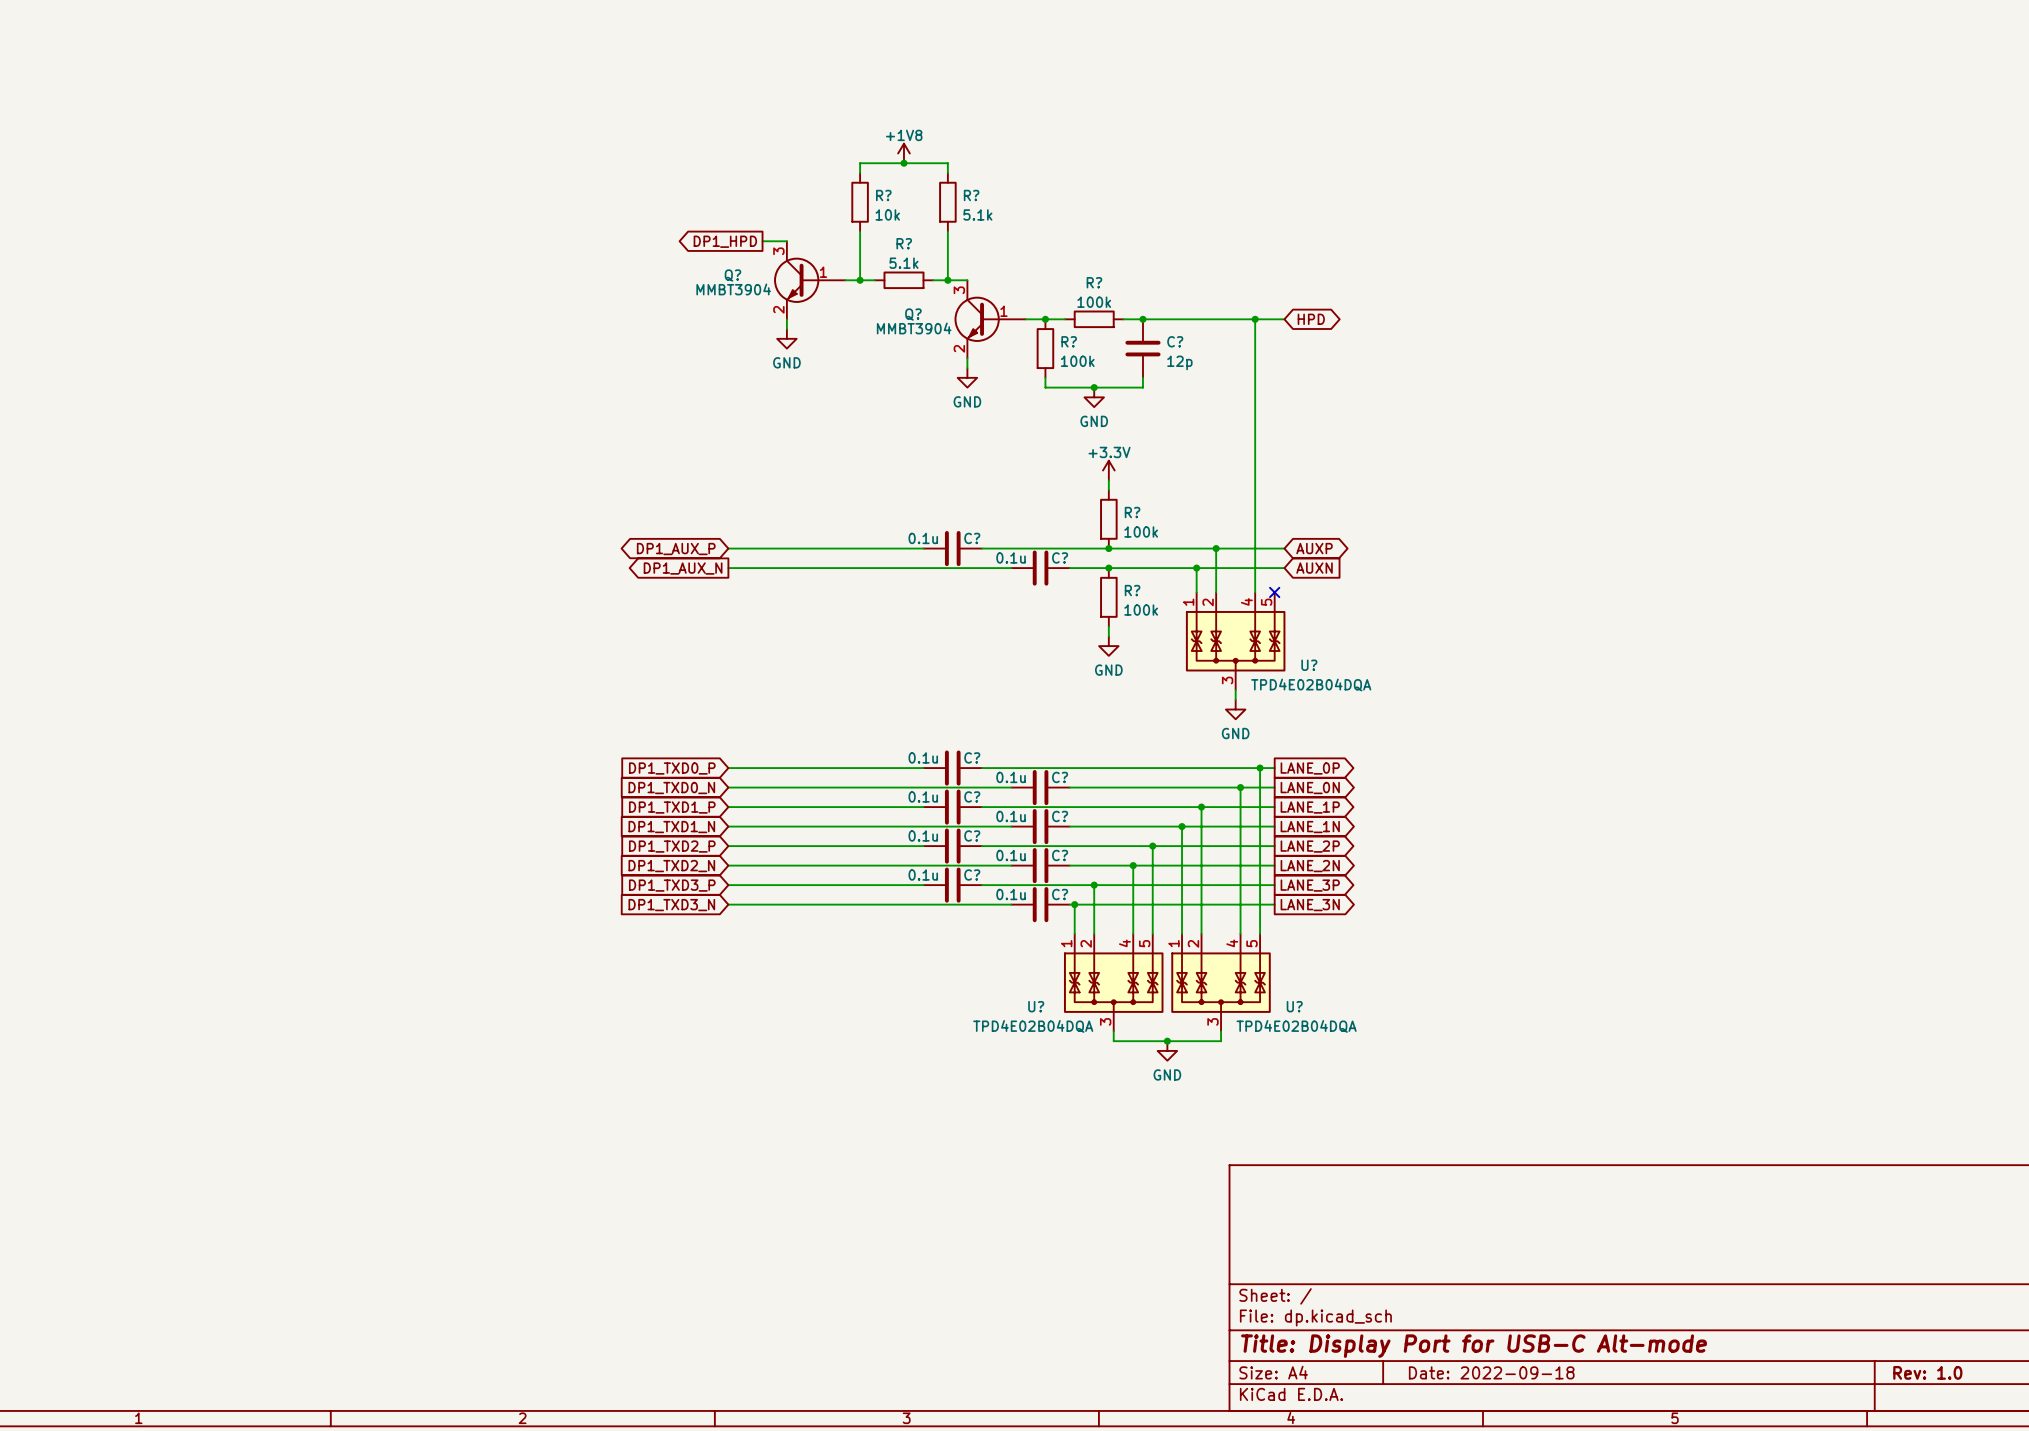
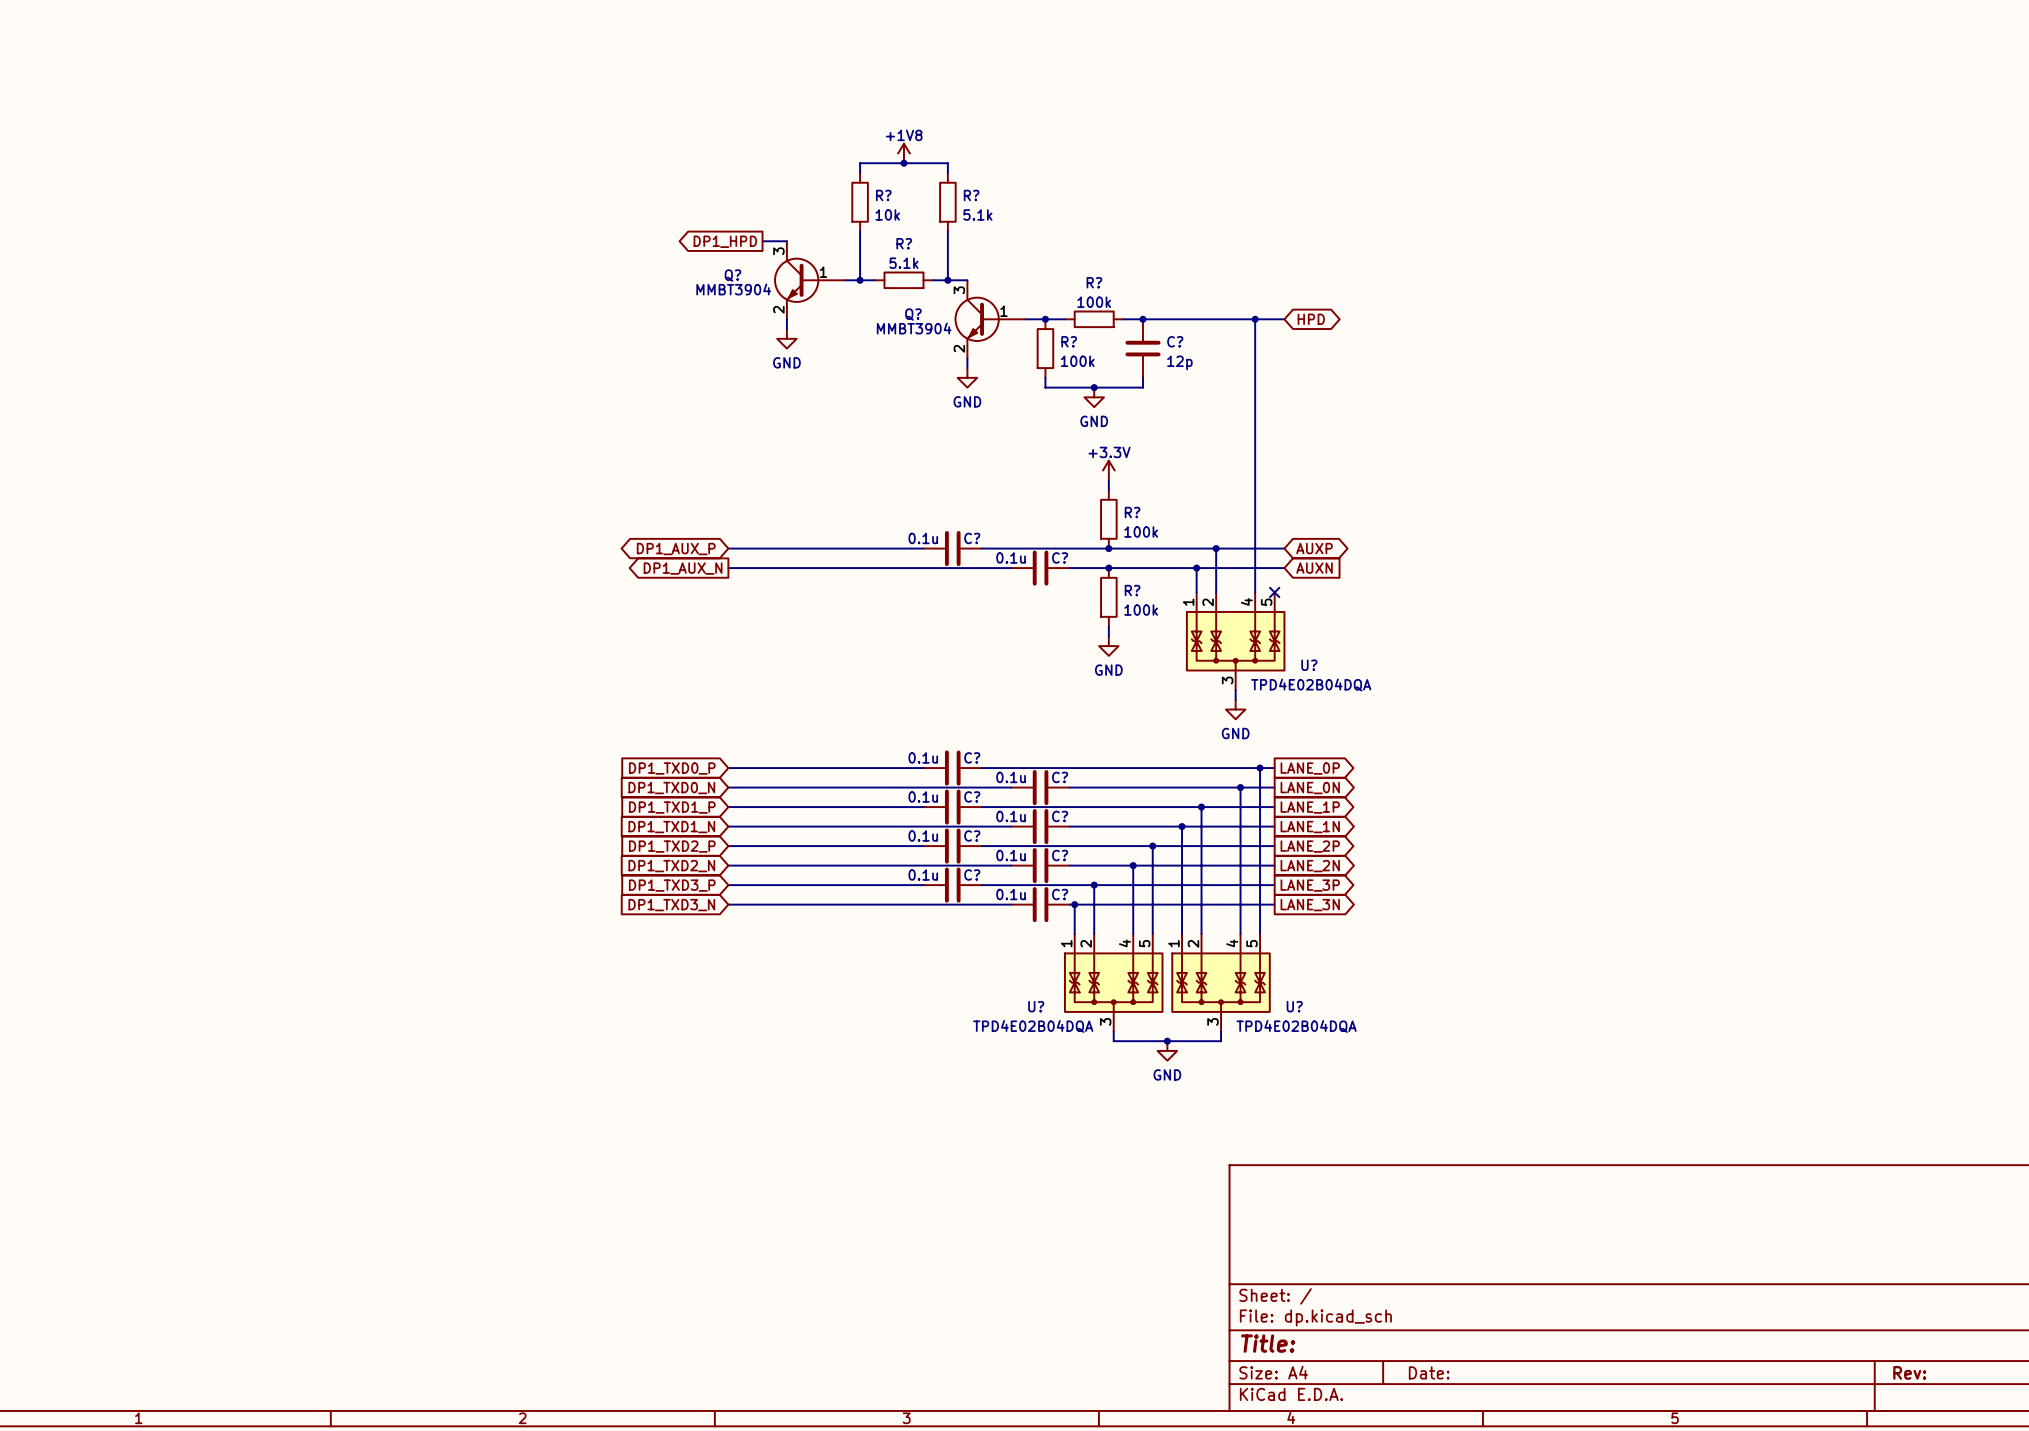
title block: Title: Display Port for USB-C Alt-mode (1474, 1346) -> Title: (1268, 1343)
title block: Date: 2022-09-18 (1491, 1372) -> Date: (1429, 1372)
title block: Rev: 1.0 (1927, 1372) -> Rev: (1909, 1372)

